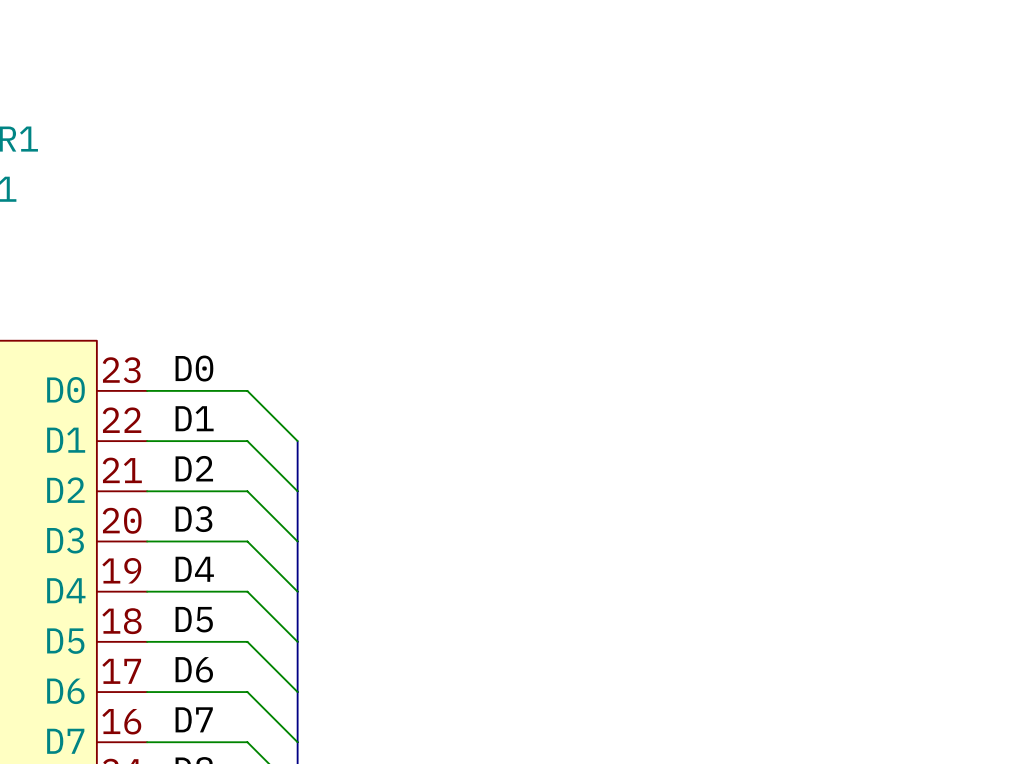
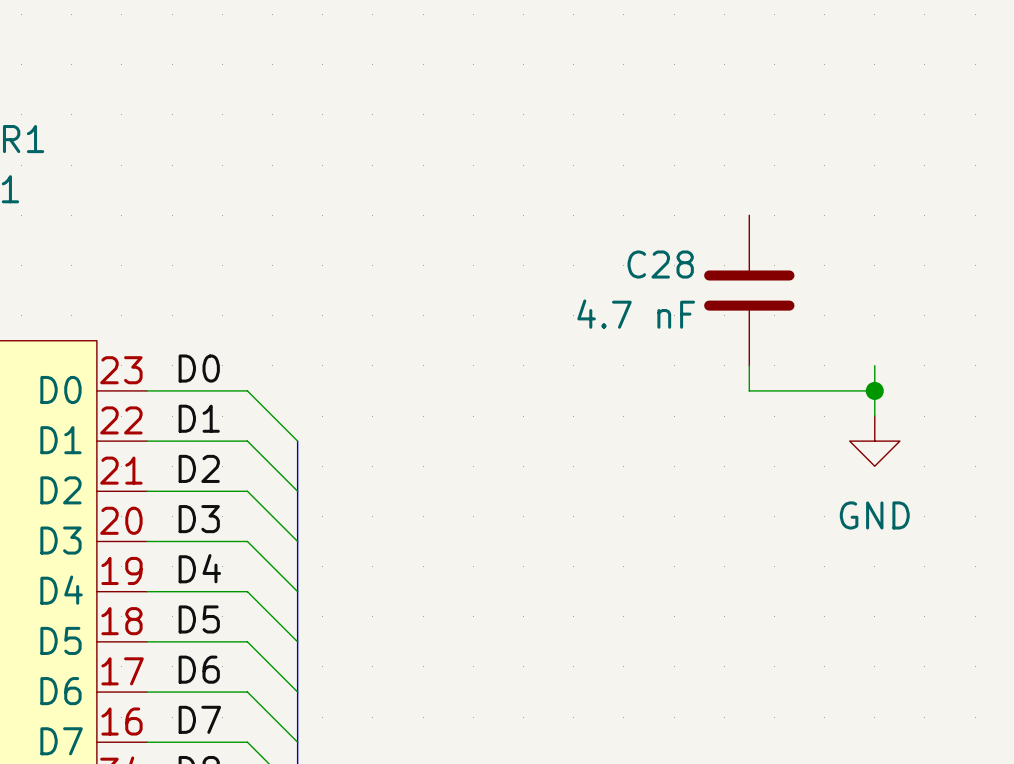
C28: none -> 4.7 nF (749, 290)
wire: none -> (749, 365) (749, 390) (874, 390)
wire: none -> (874, 365) (874, 416)
junction: none -> (874, 390)
power symbol: none -> GND (874, 441)

